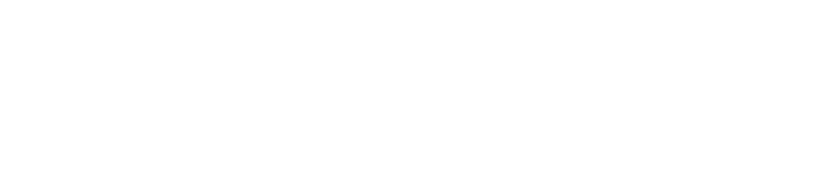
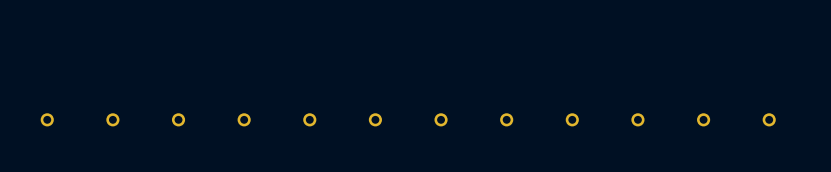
part: none -> (47, 119)
part: none -> (112, 119)
part: none -> (178, 119)
part: none -> (244, 119)
part: none -> (309, 119)
part: none -> (375, 119)
part: none -> (441, 119)
part: none -> (506, 119)
part: none -> (572, 119)
part: none -> (637, 119)
part: none -> (703, 119)
part: none -> (769, 119)

